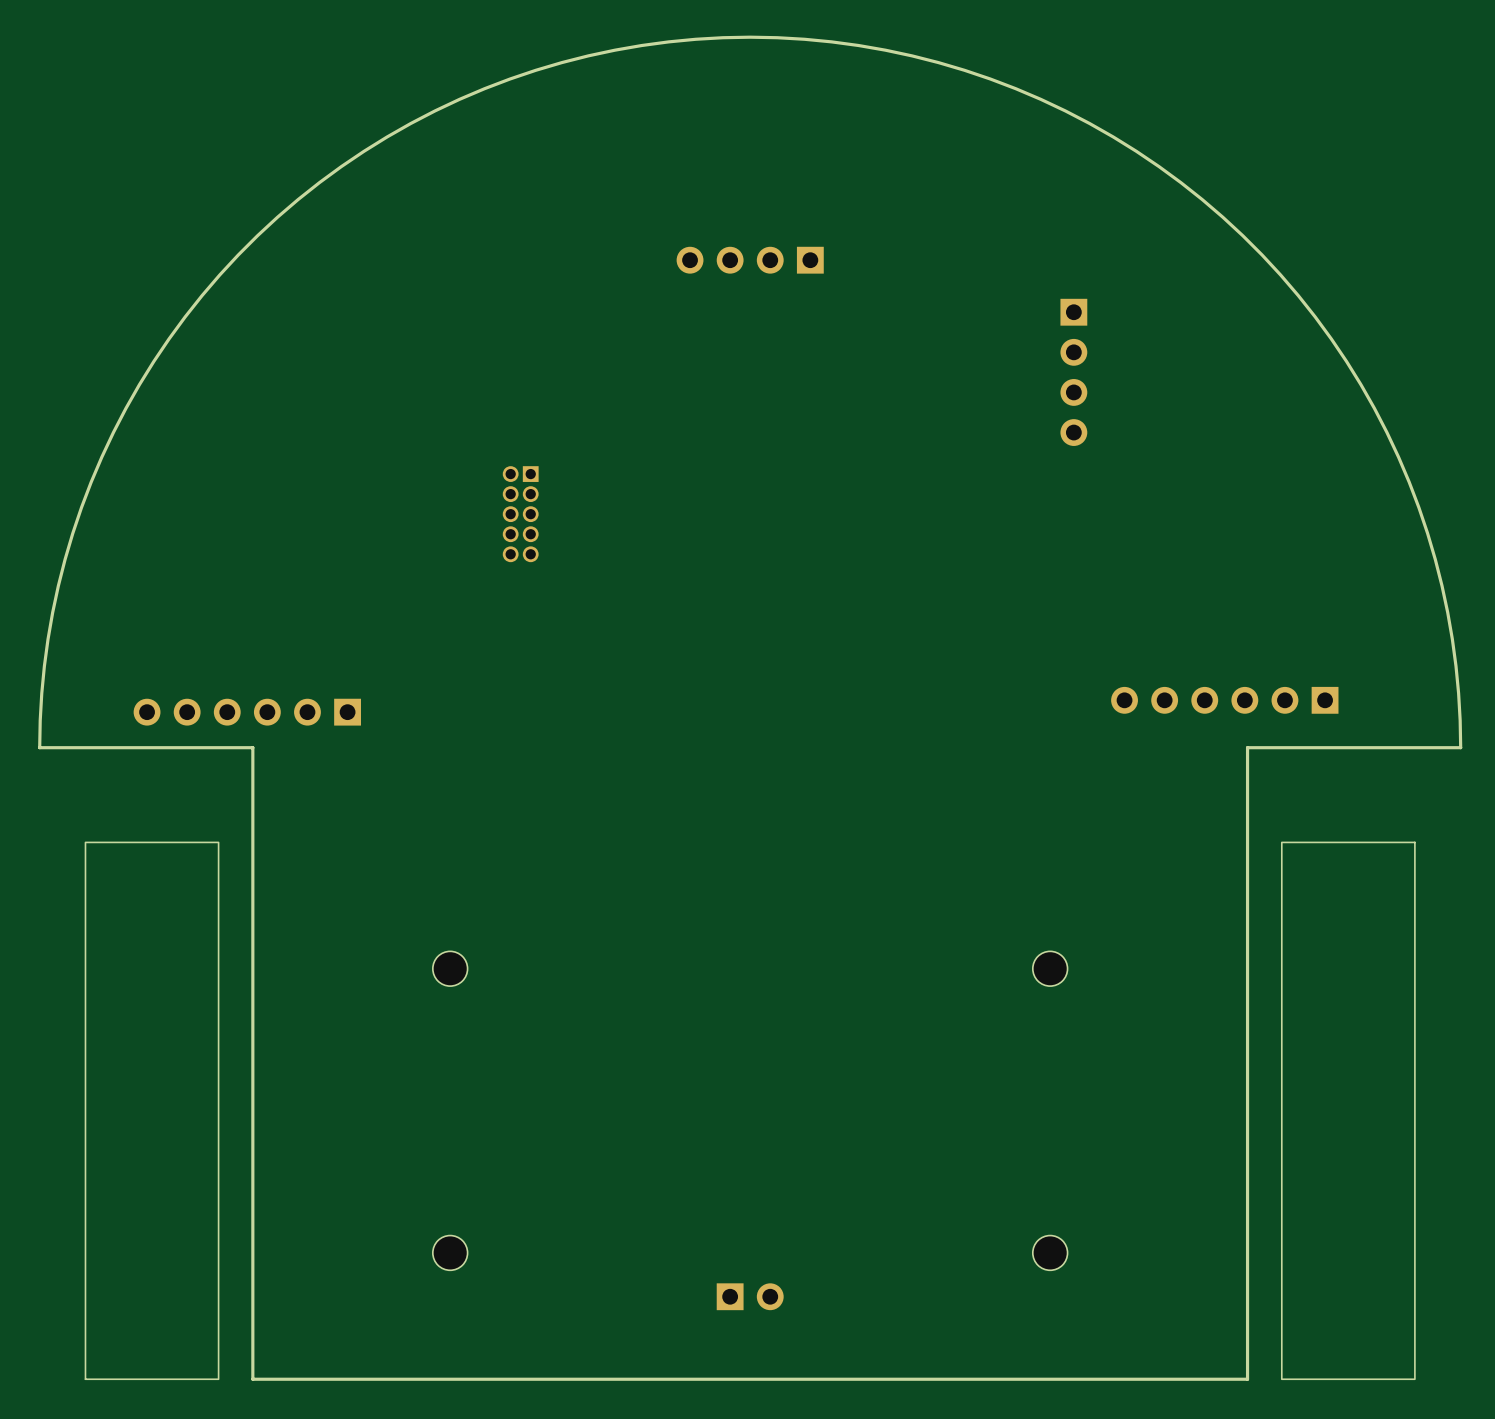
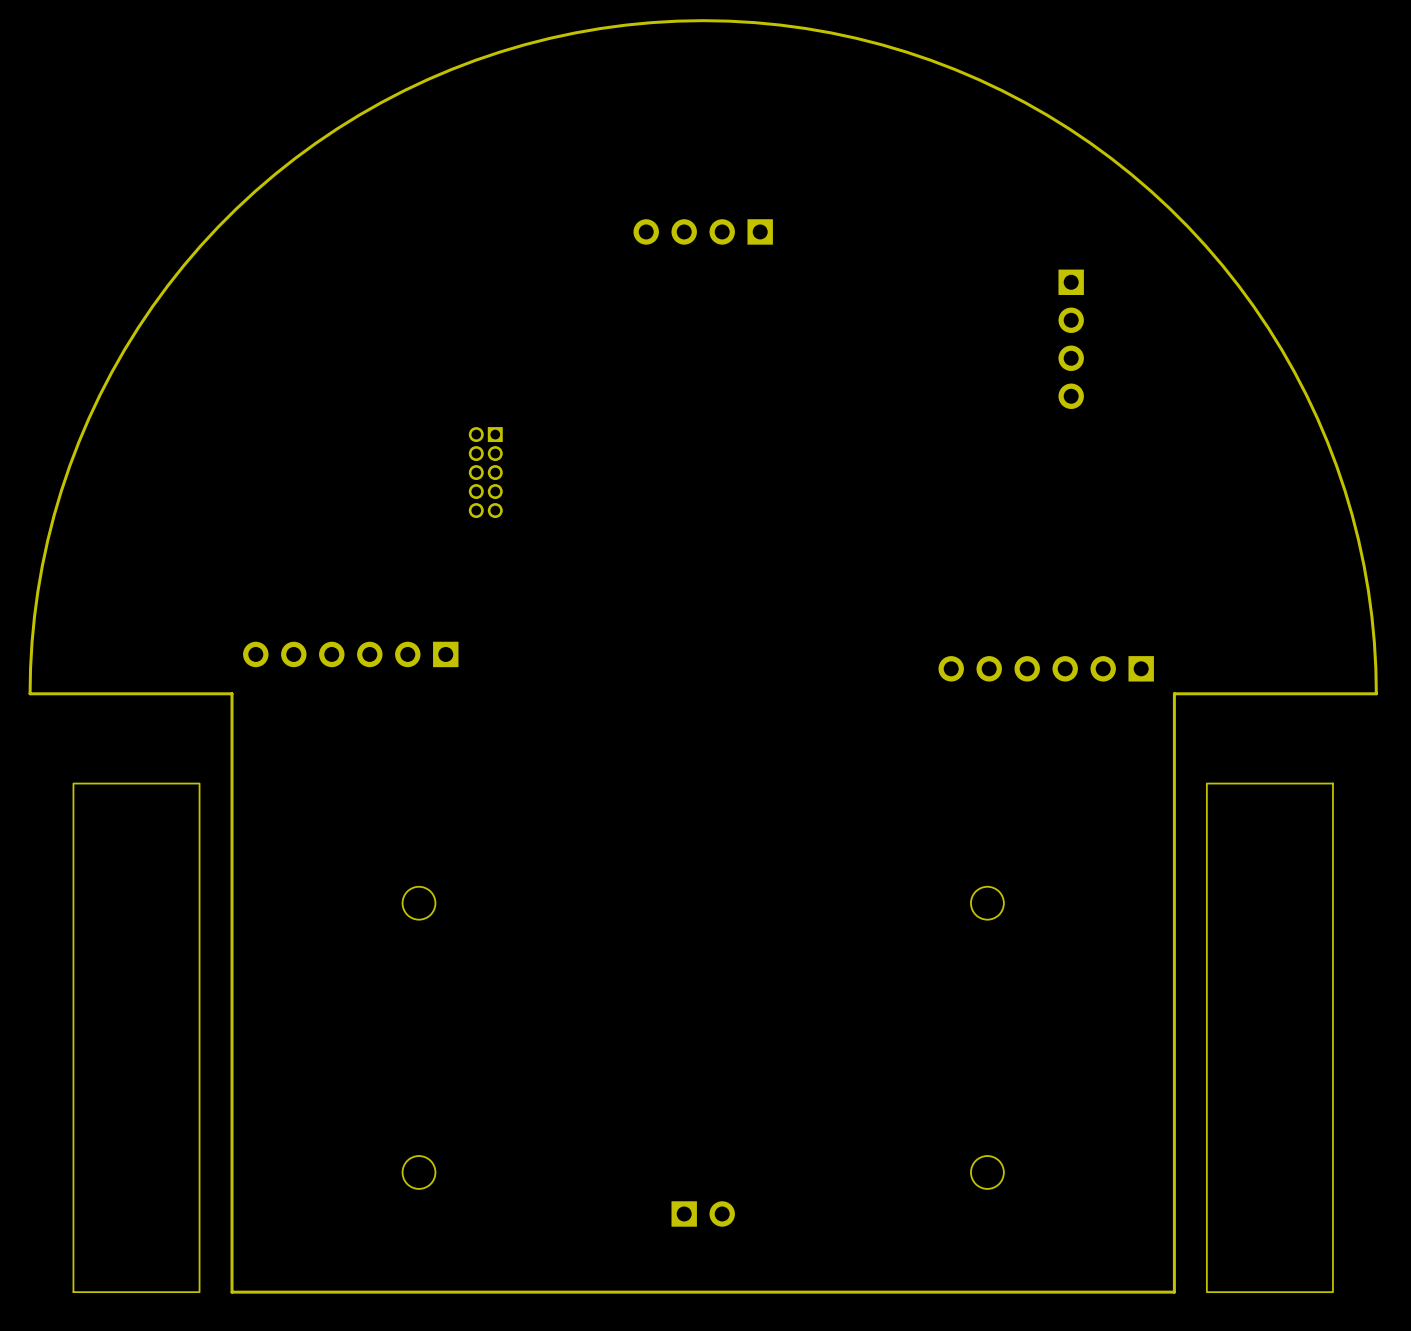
part position: (1073, 372) -> (1071, 339)
part position: (1224, 700) -> (1046, 668)
part position: (247, 712) -> (350, 654)

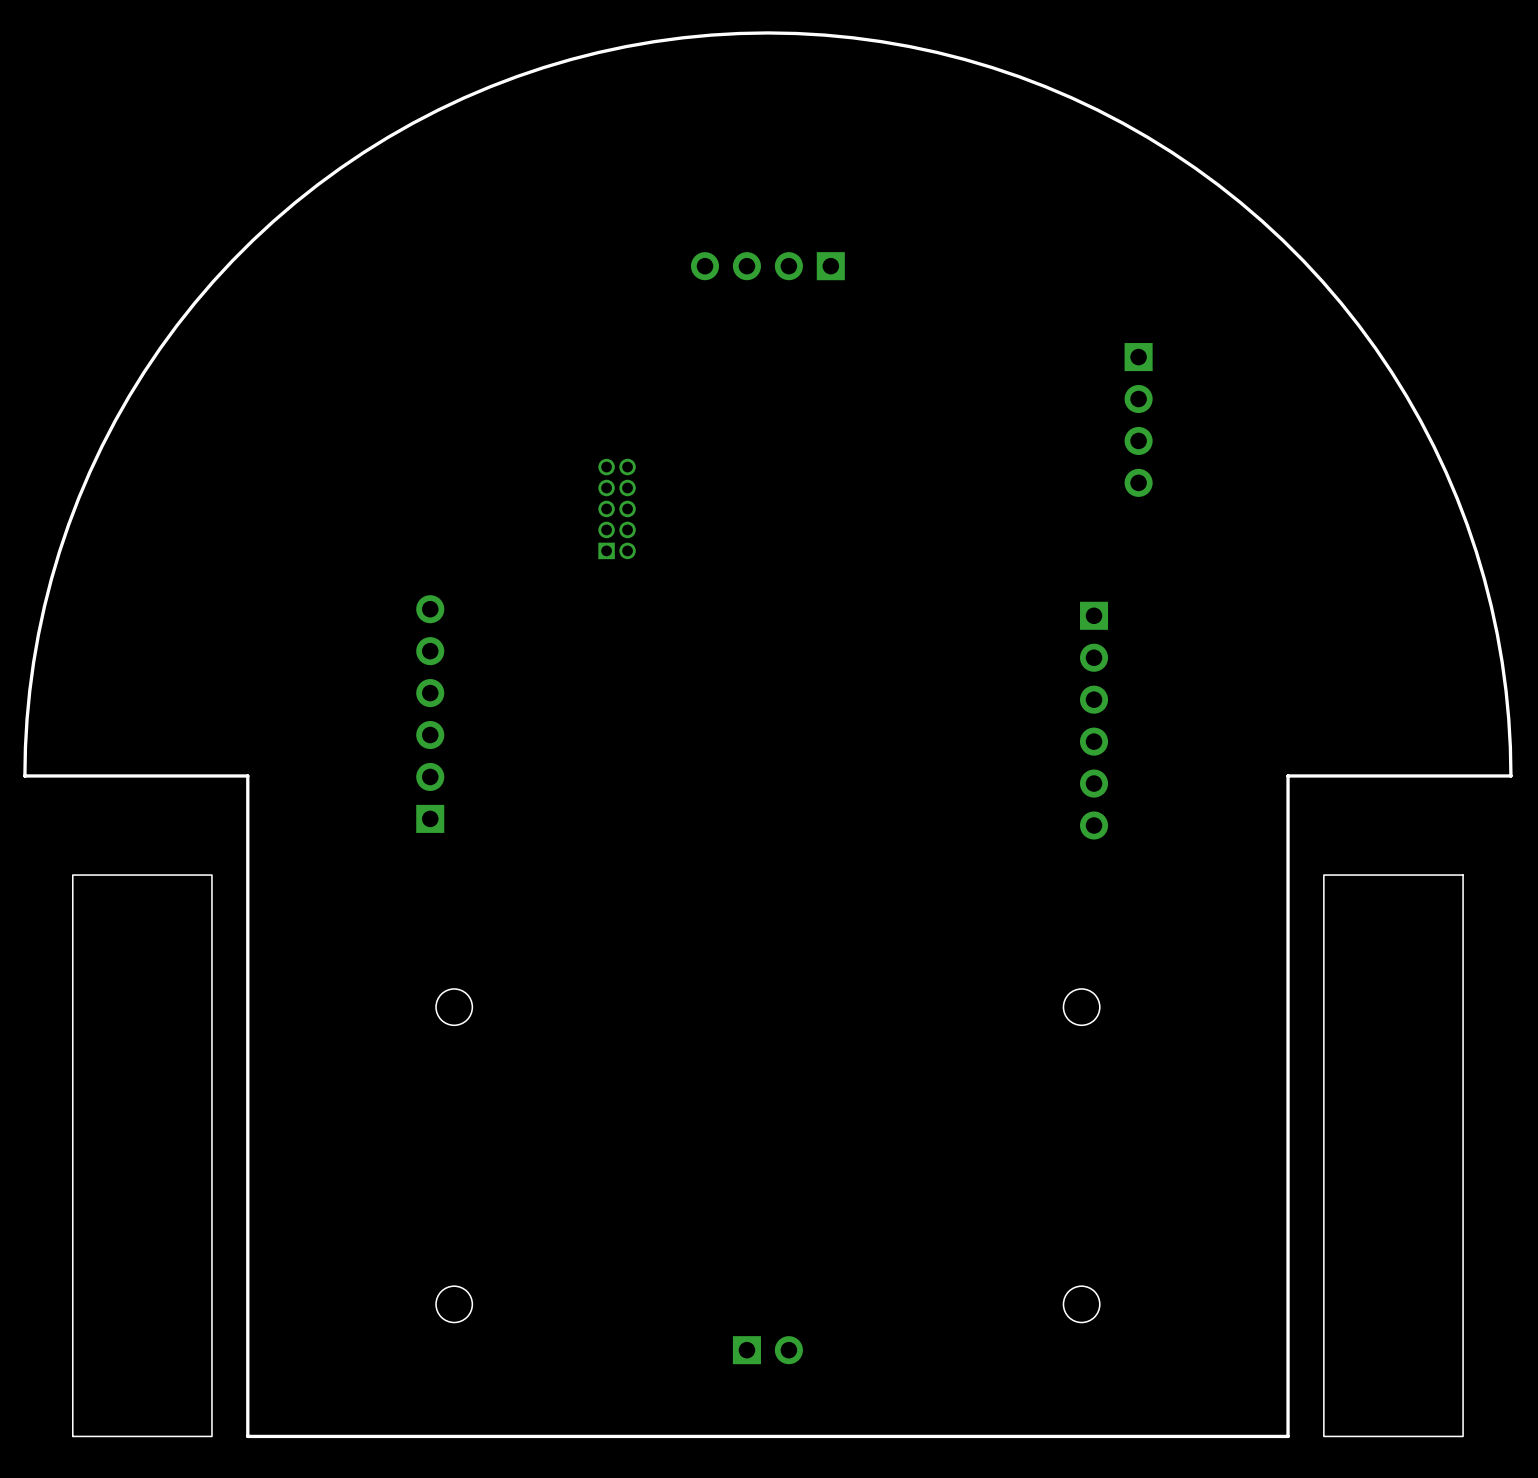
part position: (1071, 339) -> (1138, 419)
part rotation: 0° (485, 472) -> 180° (617, 508)
part position: (485, 472) -> (617, 508)
part rotation: 0° (350, 654) -> 90° clockwise (430, 714)
part rotation: 0° (1046, 668) -> 90° counterclockwise (1094, 720)

